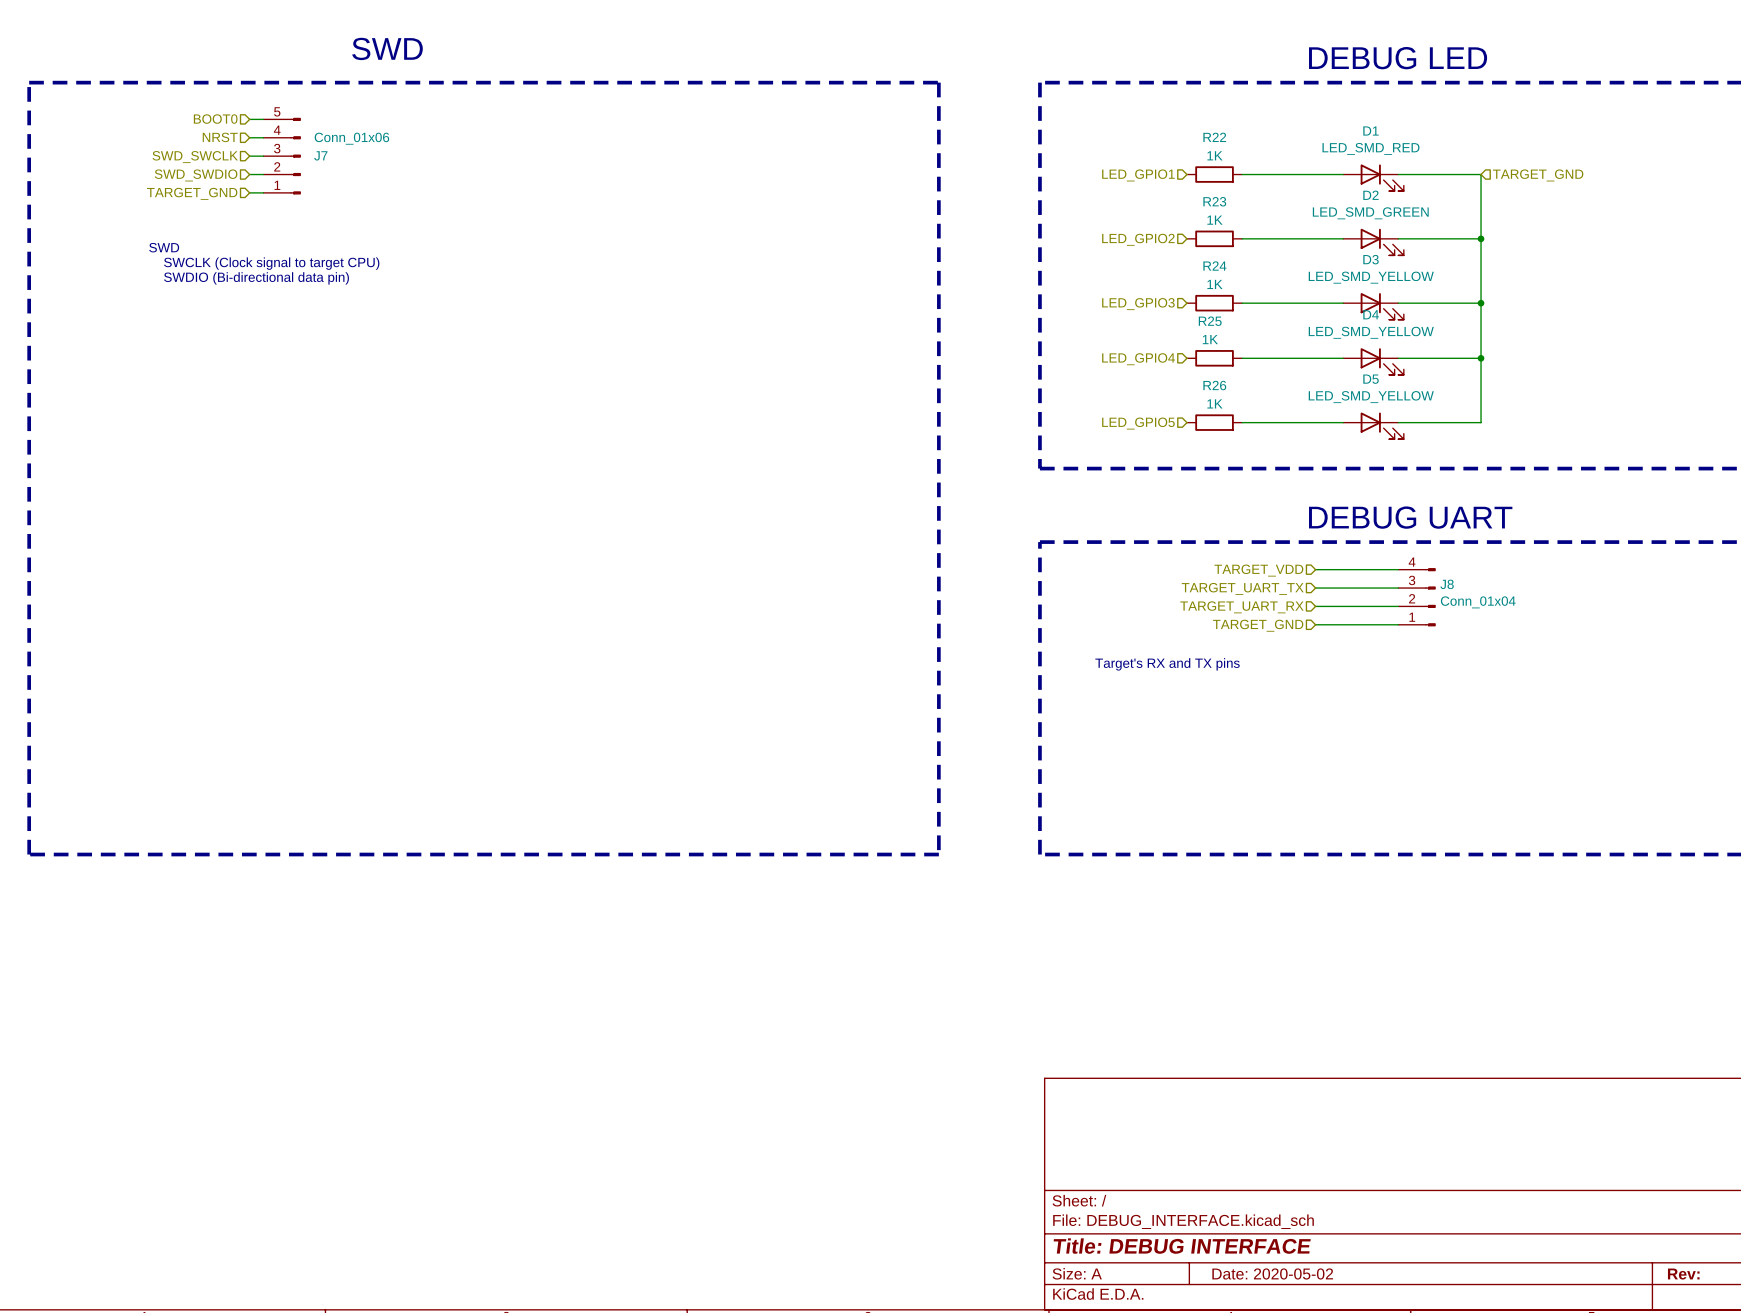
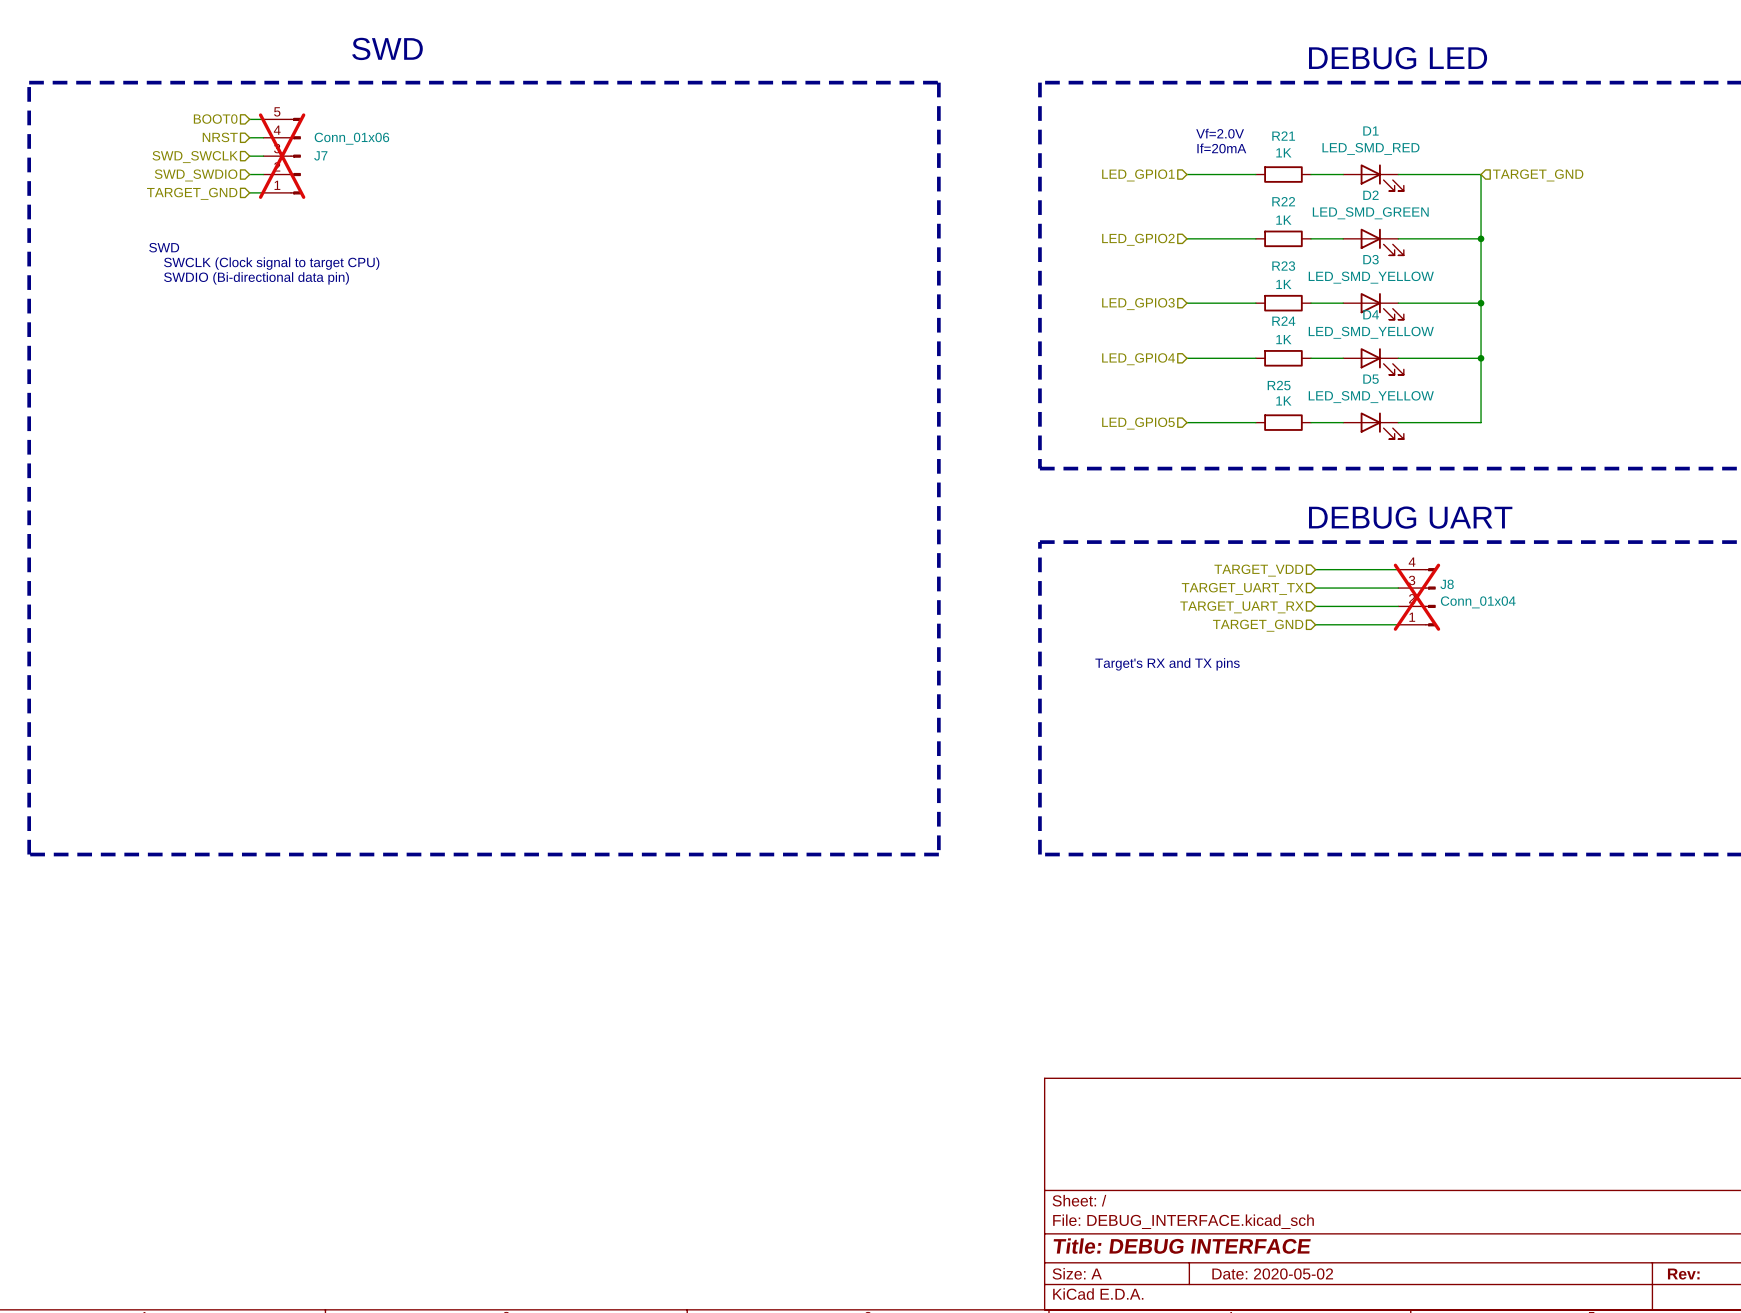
text: none -> Vf=2.0V (1220, 133)
text: none -> If=20mA (1221, 148)
J7 do-not-place cross: none -> (282, 156)
R22 position: (1214, 174) -> (1283, 238)
wire: (1255, 174) (1311, 174) -> (1186, 174) (1242, 174)
R21: none -> 1K (1283, 174)
R23 position: (1214, 238) -> (1283, 303)
wire: (1255, 238) (1311, 238) -> (1186, 238) (1242, 238)
R24 position: (1214, 303) -> (1283, 358)
wire: (1255, 303) (1311, 303) -> (1186, 303) (1242, 303)
R25 value position: 1K (1210, 339) -> 1K (1283, 400)
R25 position: (1214, 358) -> (1283, 422)
wire: (1255, 358) (1311, 358) -> (1186, 358) (1242, 358)
R26: 1K (1214, 422) -> none
wire: (1255, 422) (1311, 422) -> (1186, 422) (1242, 422)
J8 do-not-place cross: none -> (1416, 597)

